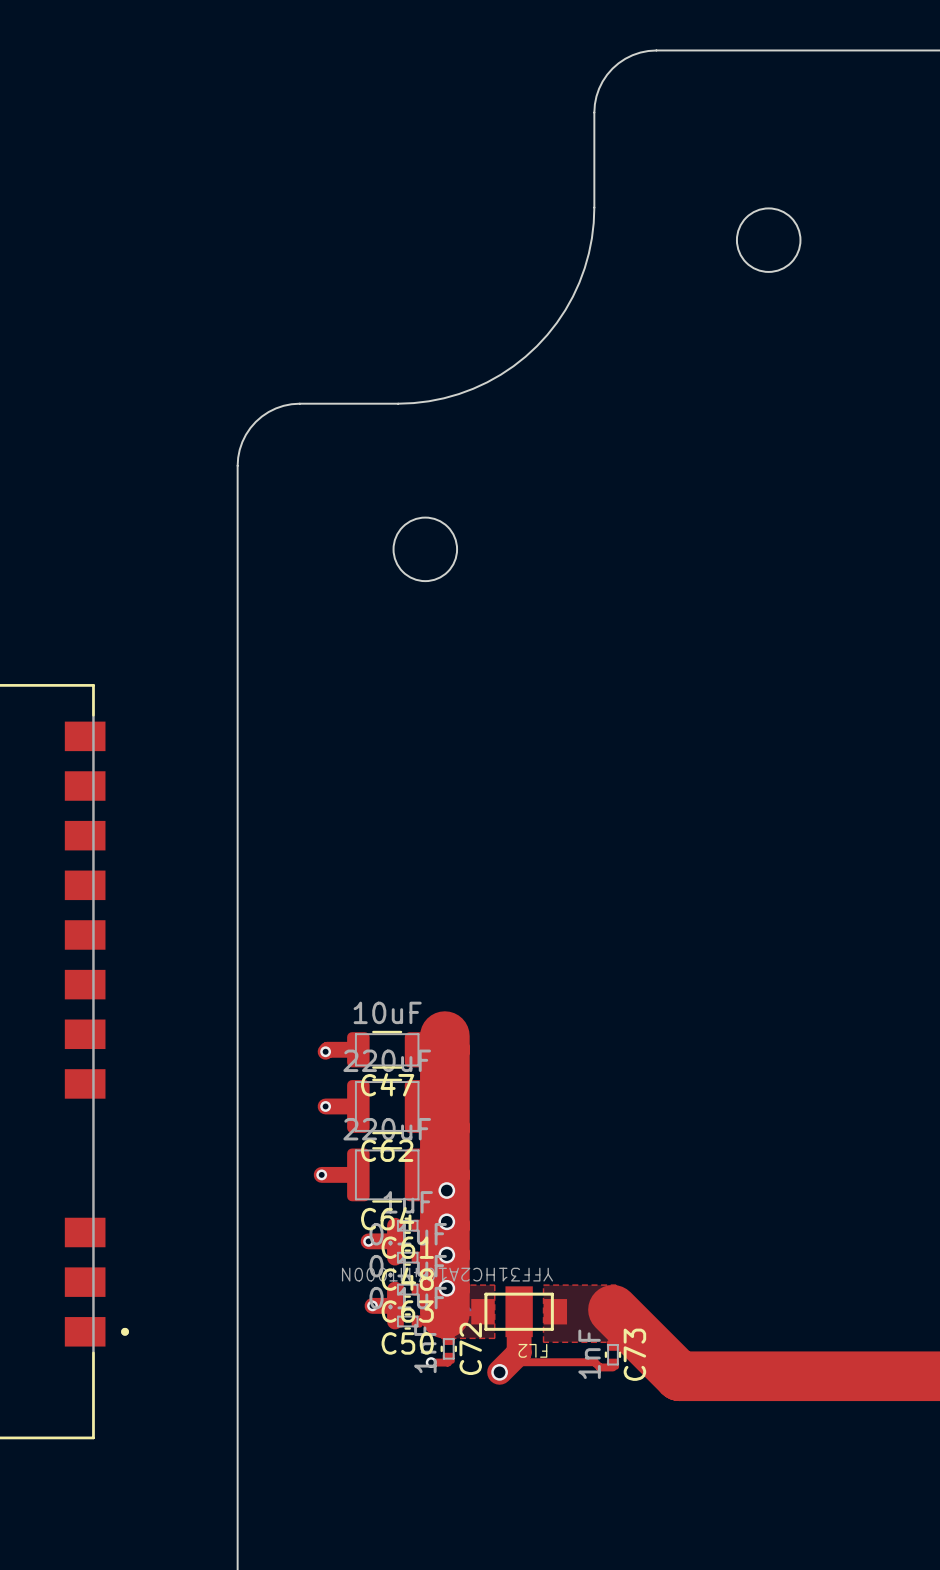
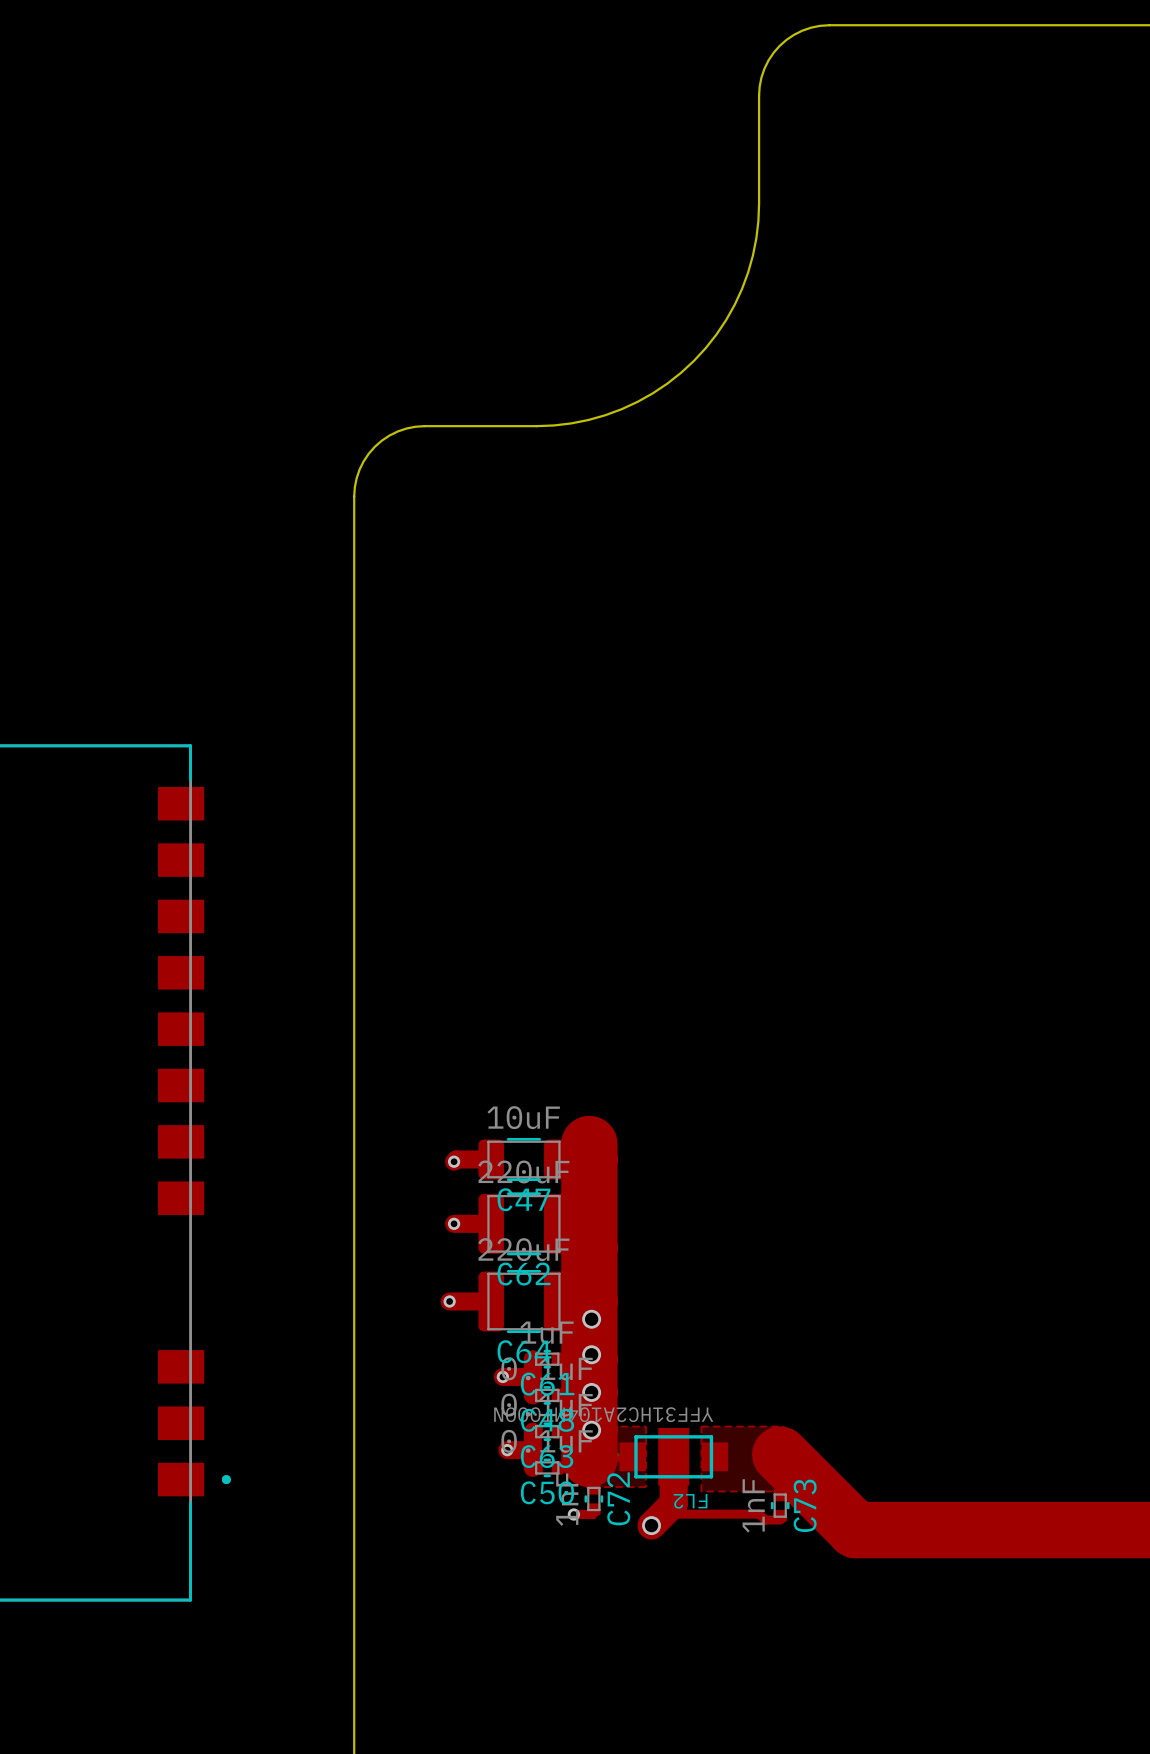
round board edge: [735, 207, 802, 273] -> none
round board edge: [392, 516, 459, 583] -> none

